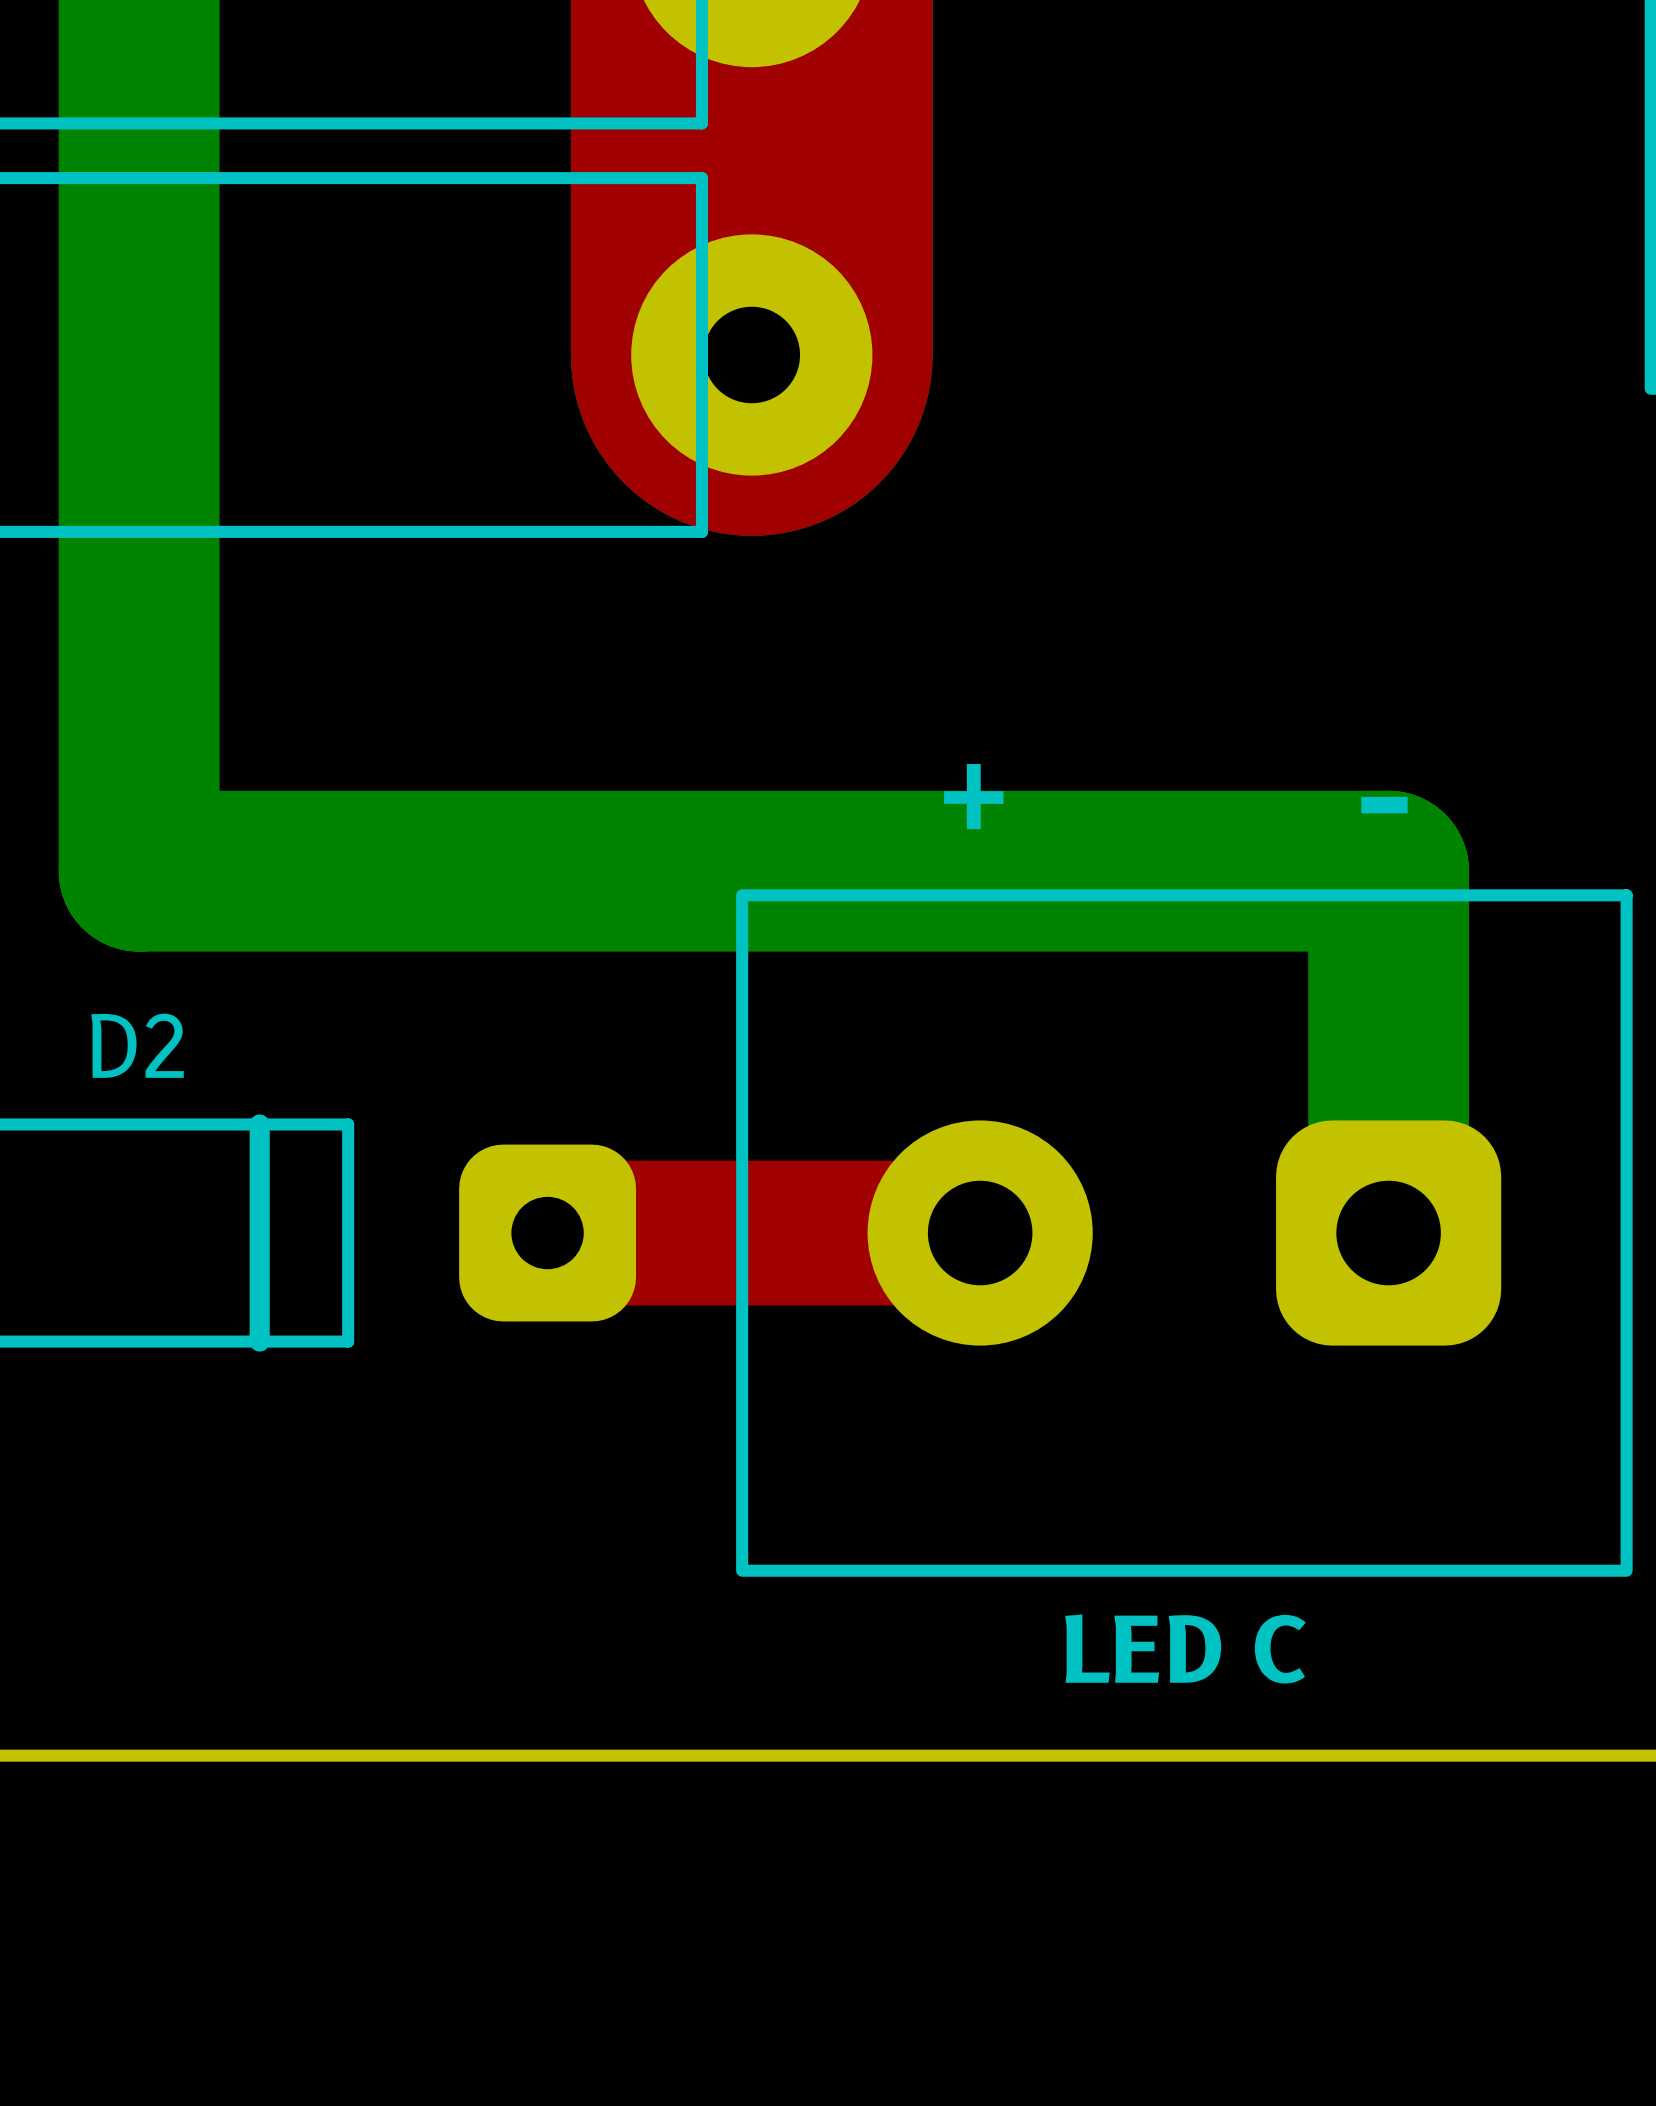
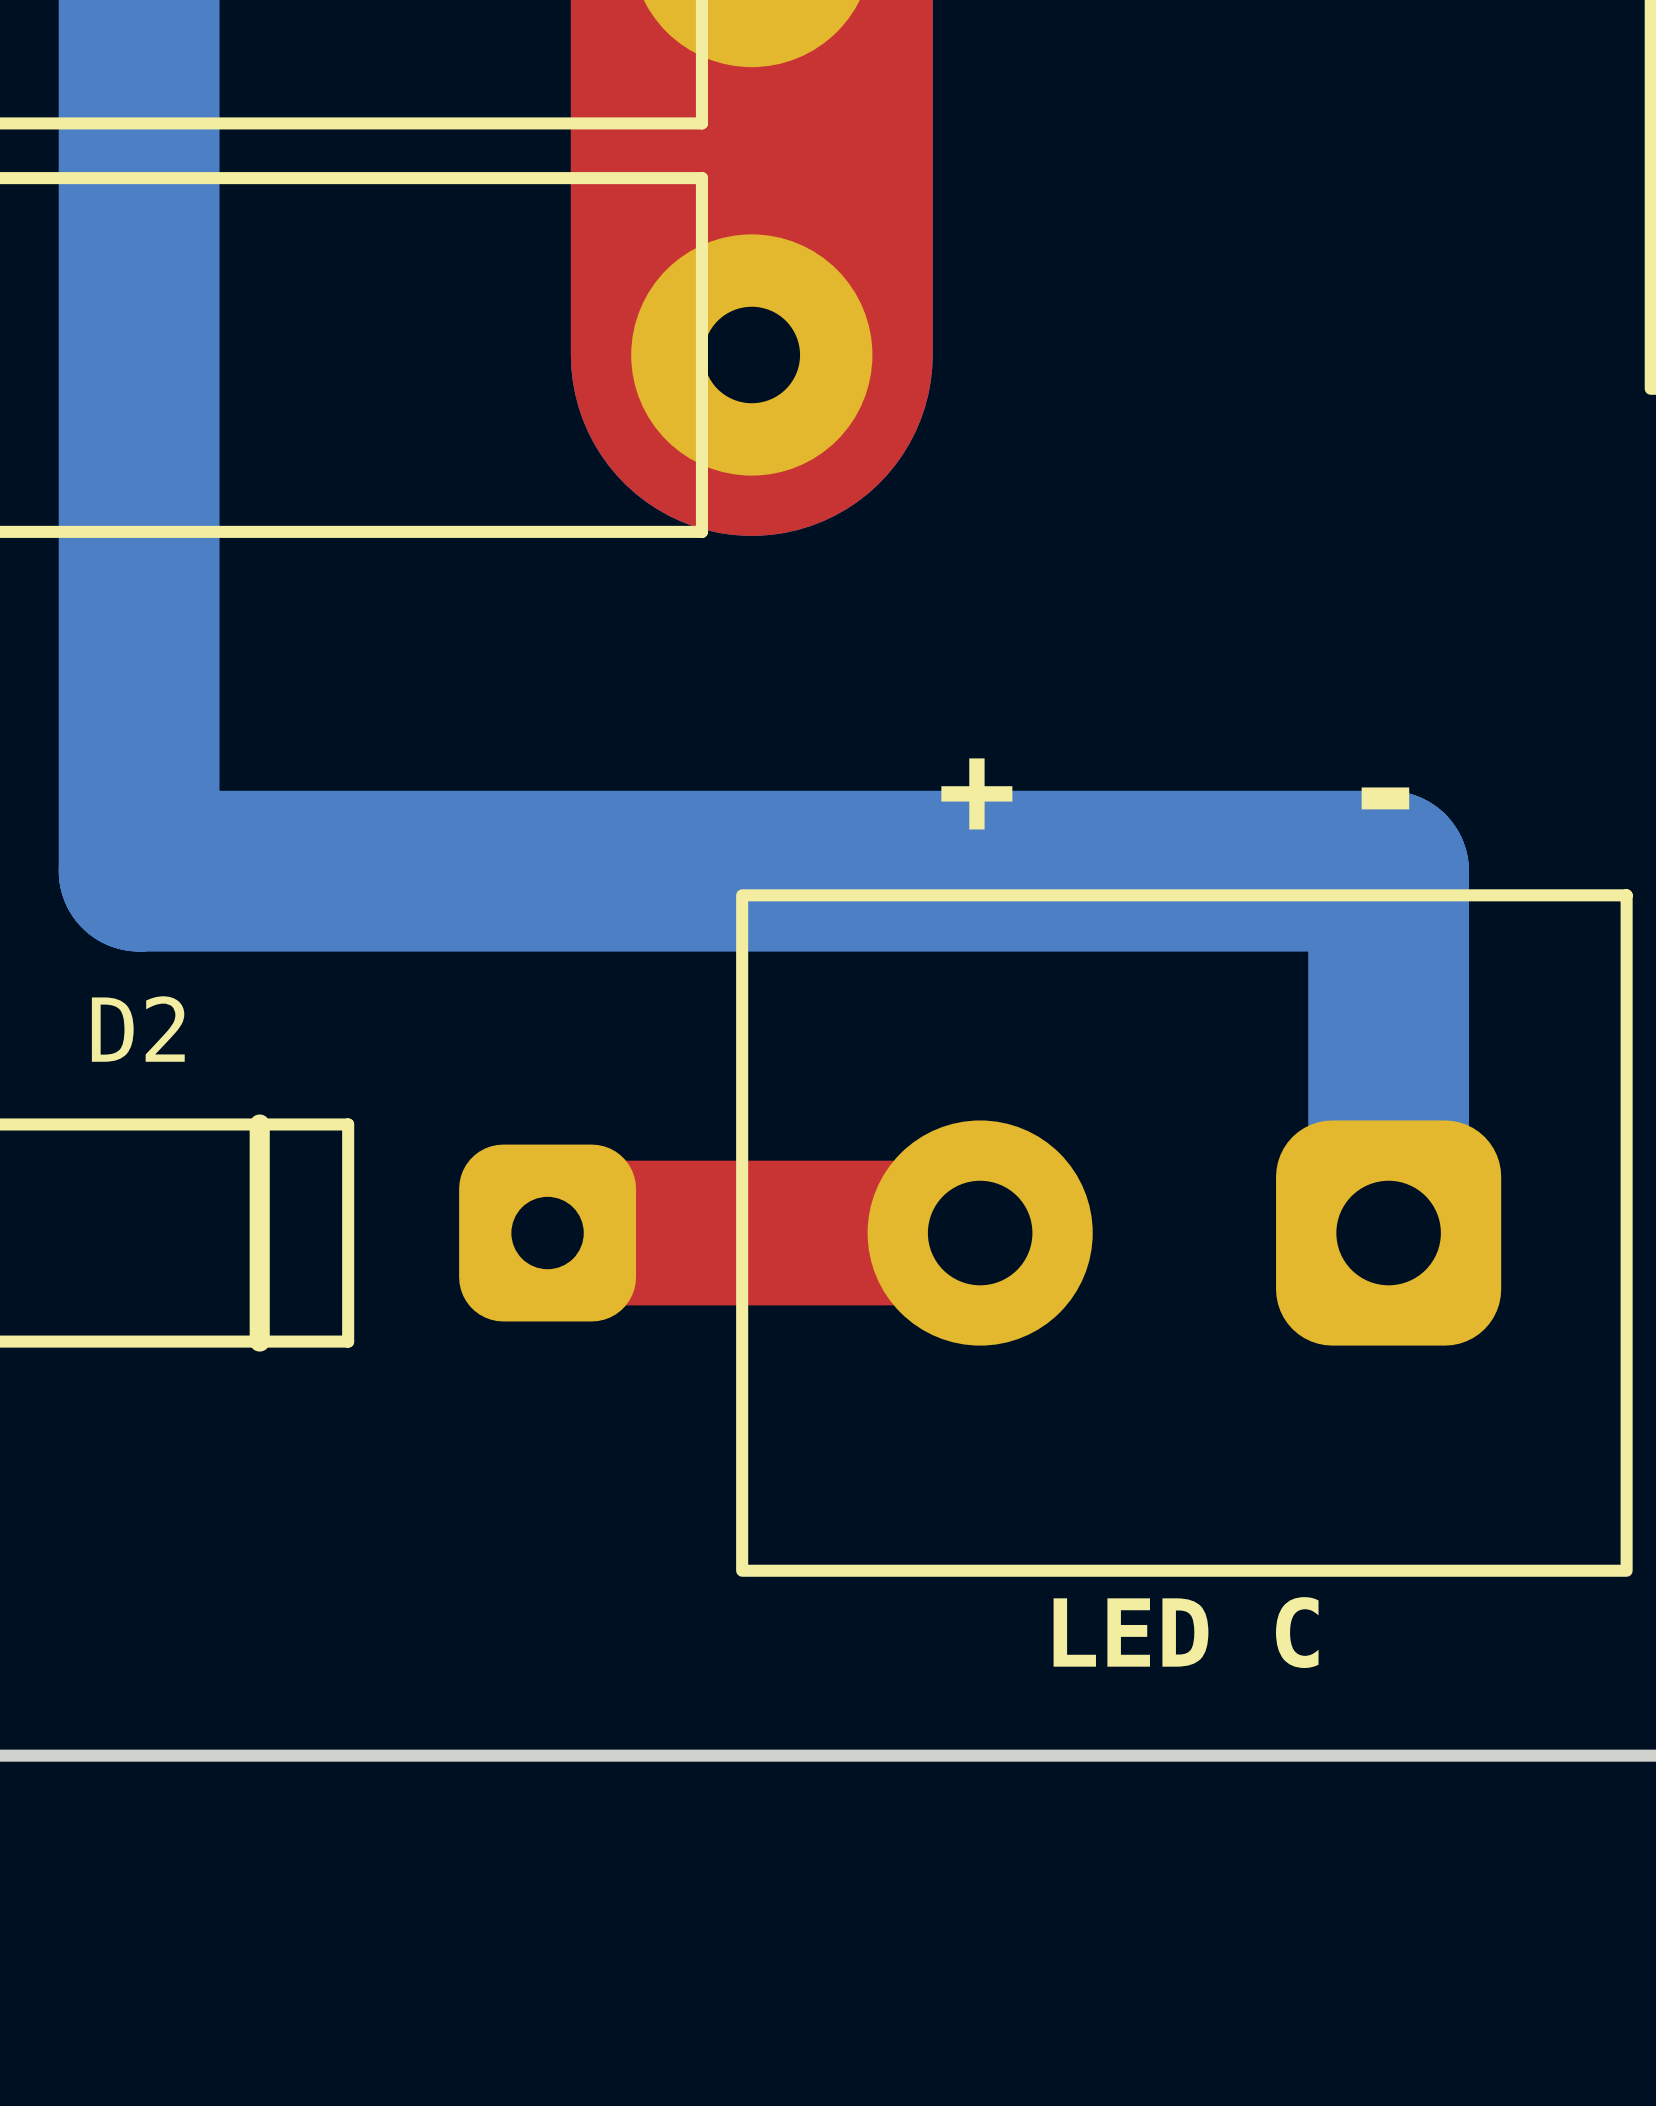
D2 name position: D2 (137, 1045) -> D2 (138, 1029)
text position: LED C (1185, 1649) -> LED C (1186, 1632)

